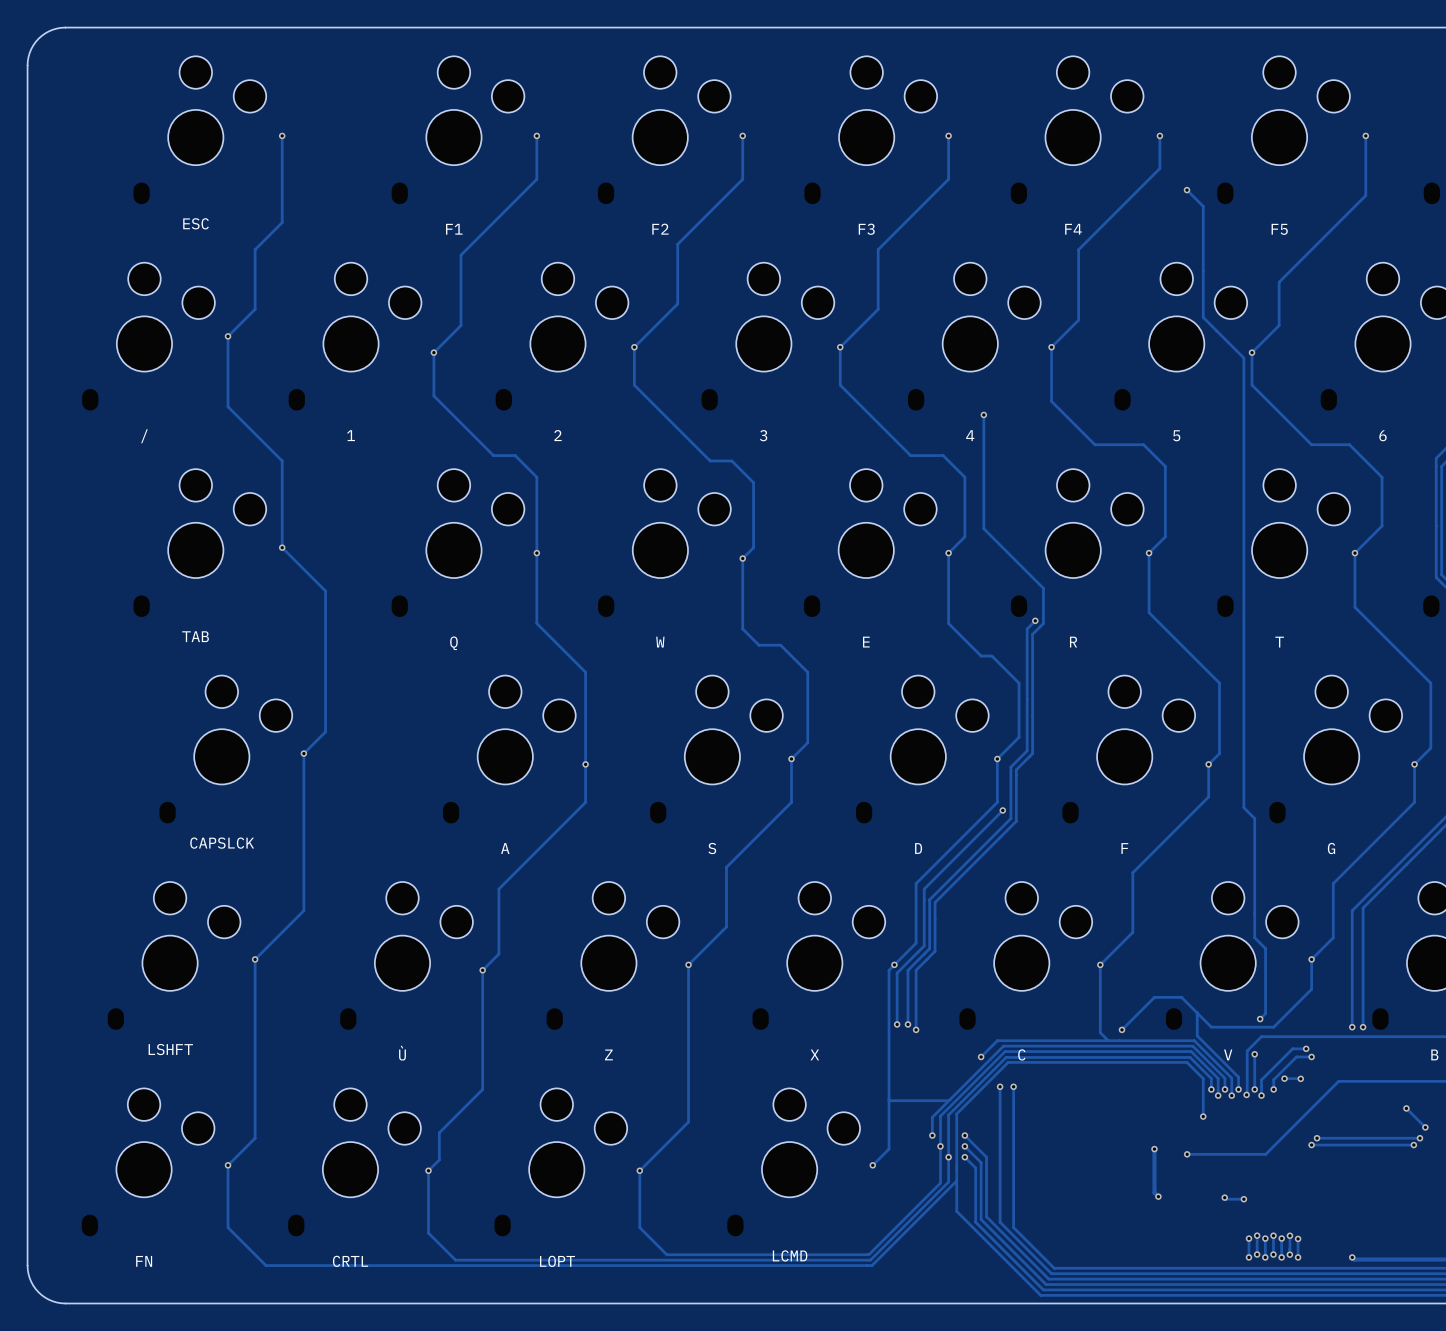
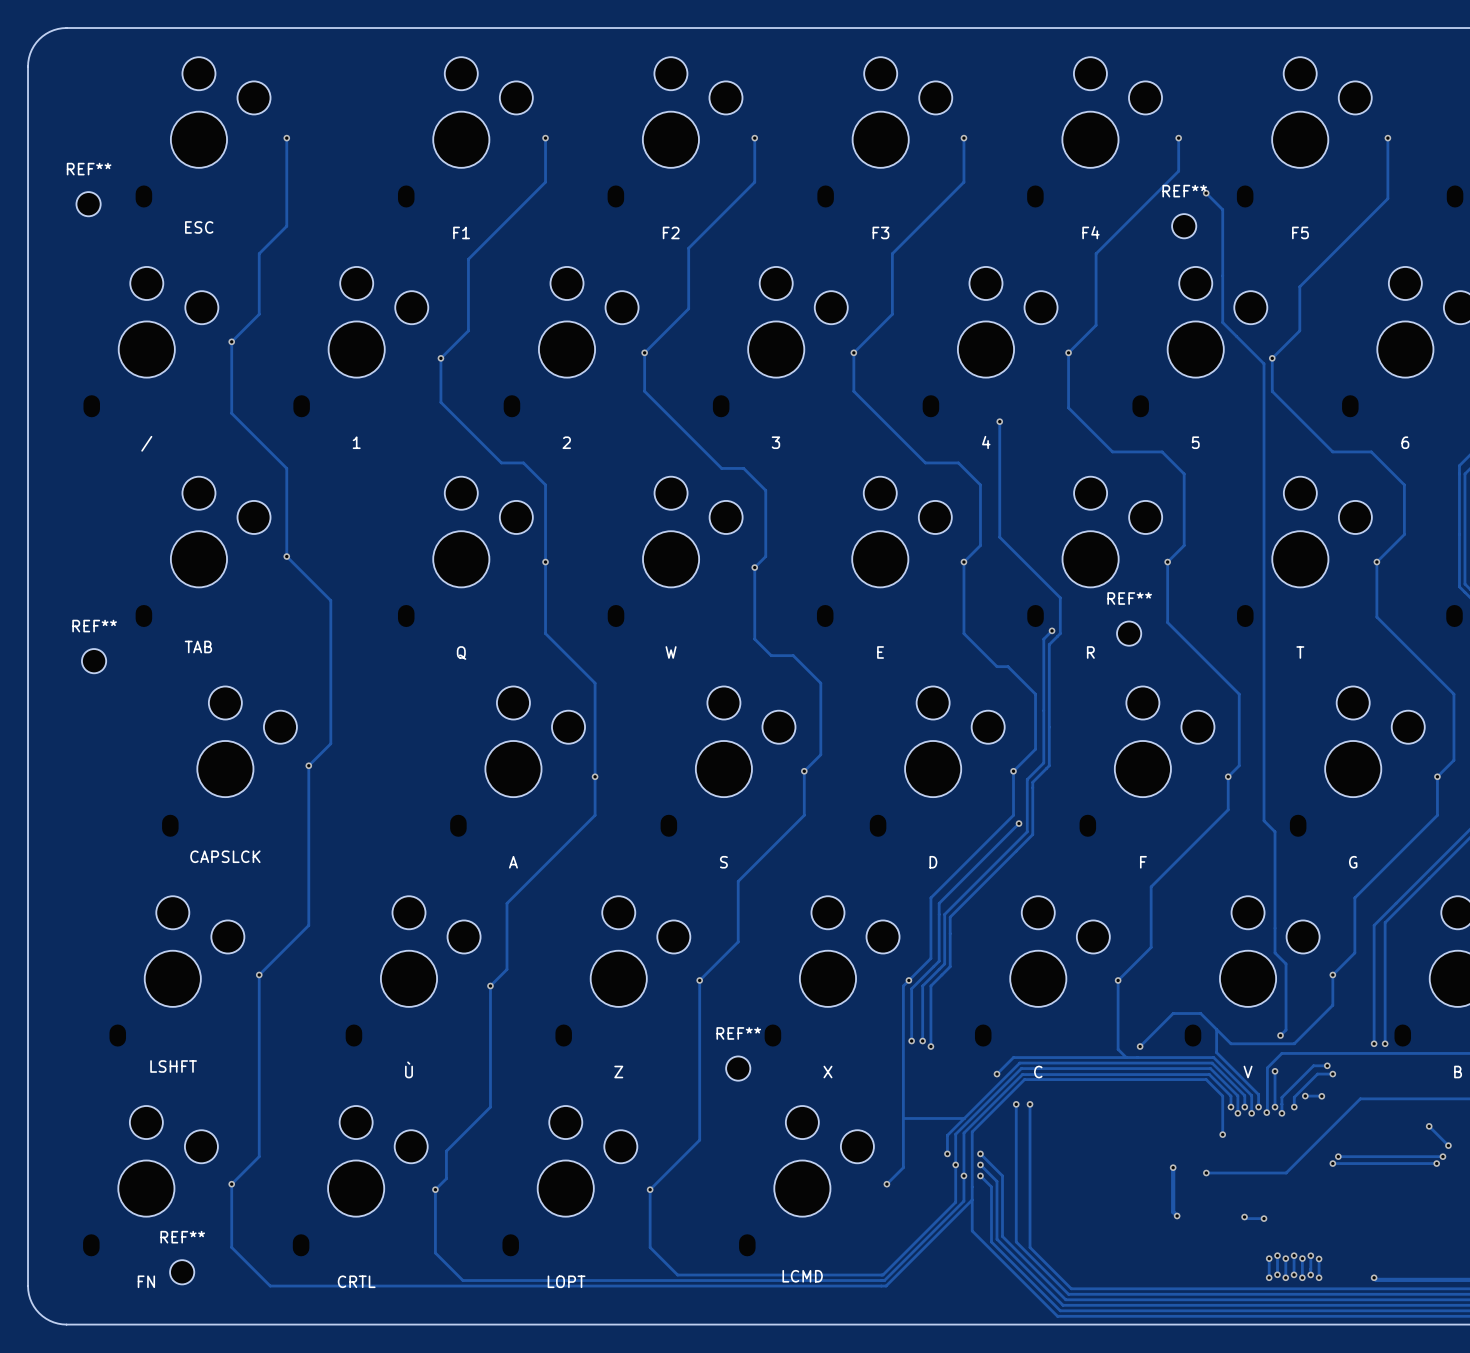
REF**: none -> (88, 204)
REF**: none -> (1184, 226)
REF**: none -> (1129, 633)
REF**: none -> (94, 661)
REF**: none -> (738, 1068)
REF**: none -> (182, 1272)

